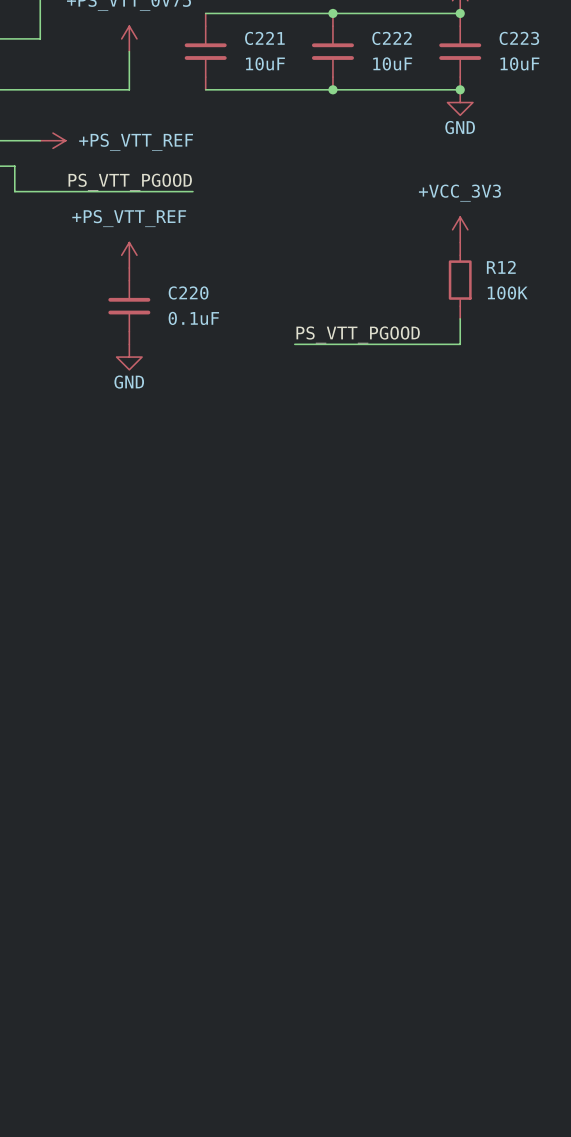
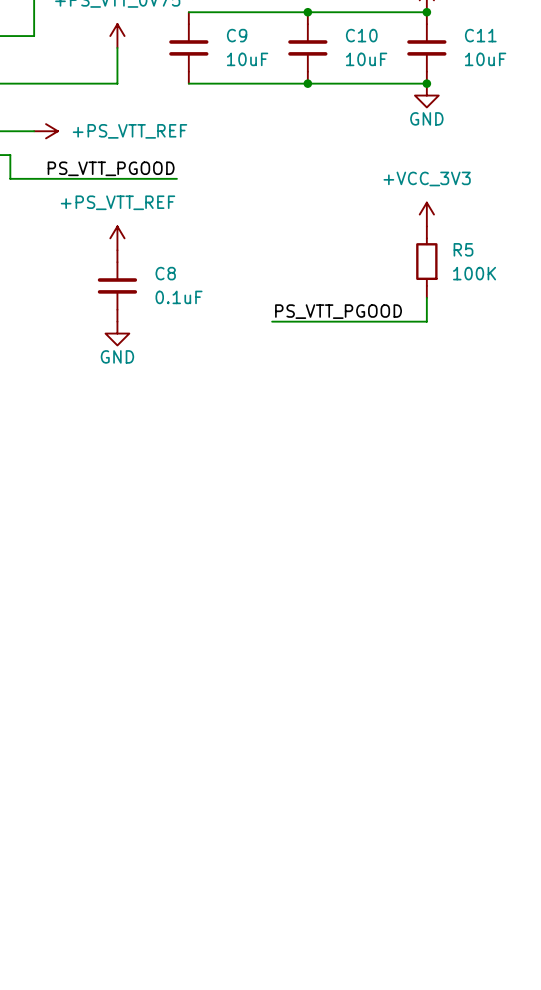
C221 name: C221 (264, 38) -> C9 (237, 35)
C222 name: C222 (392, 38) -> C10 (361, 35)
C223 name: C223 (519, 38) -> C11 (480, 35)
R12 name: R12 (501, 267) -> R5 (463, 249)
C220 name: C220 (188, 292) -> C8 (165, 273)

